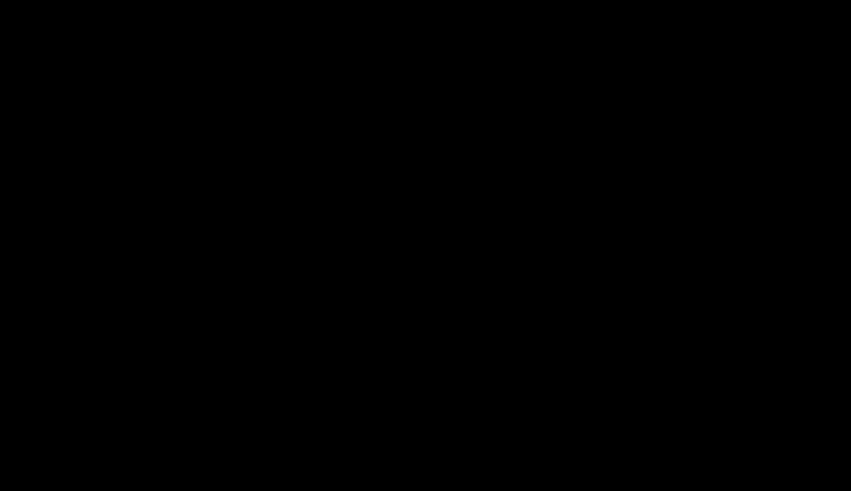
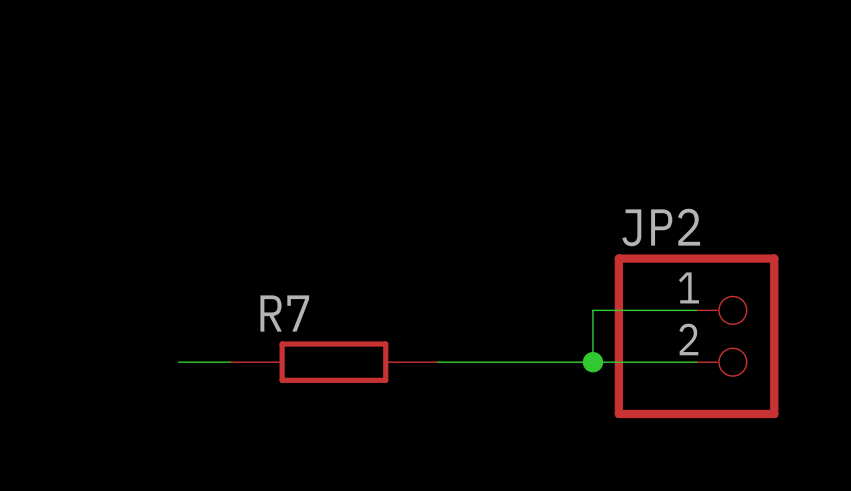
wire: none -> (696, 310) (592, 310) (592, 362)
JP2: none -> (696, 336)
wire: none -> (178, 362) (230, 362)
R7: none -> (333, 362)
wire: none -> (437, 362) (696, 362)
junction: none -> (592, 362)

